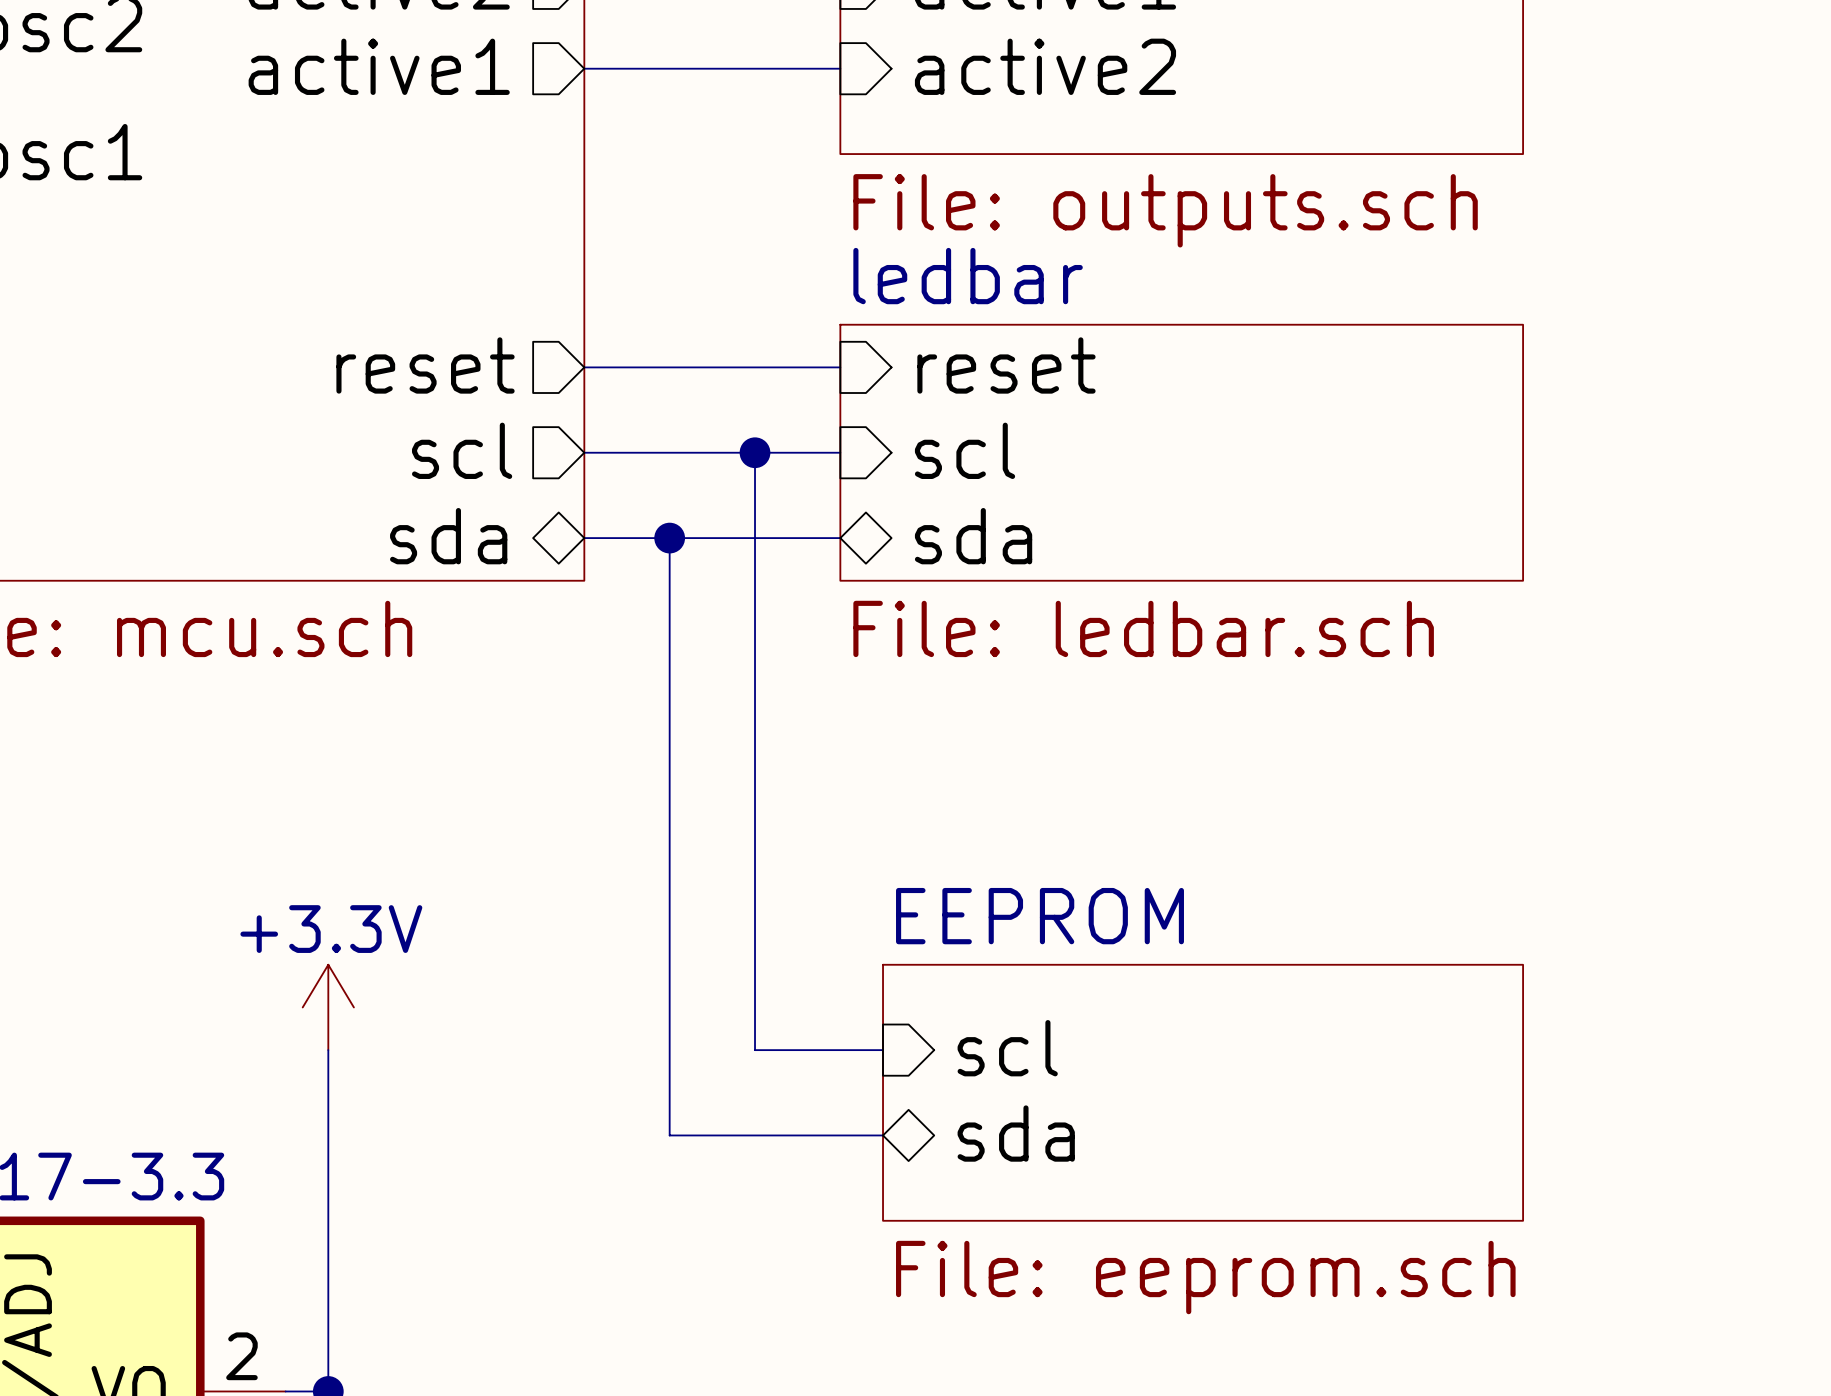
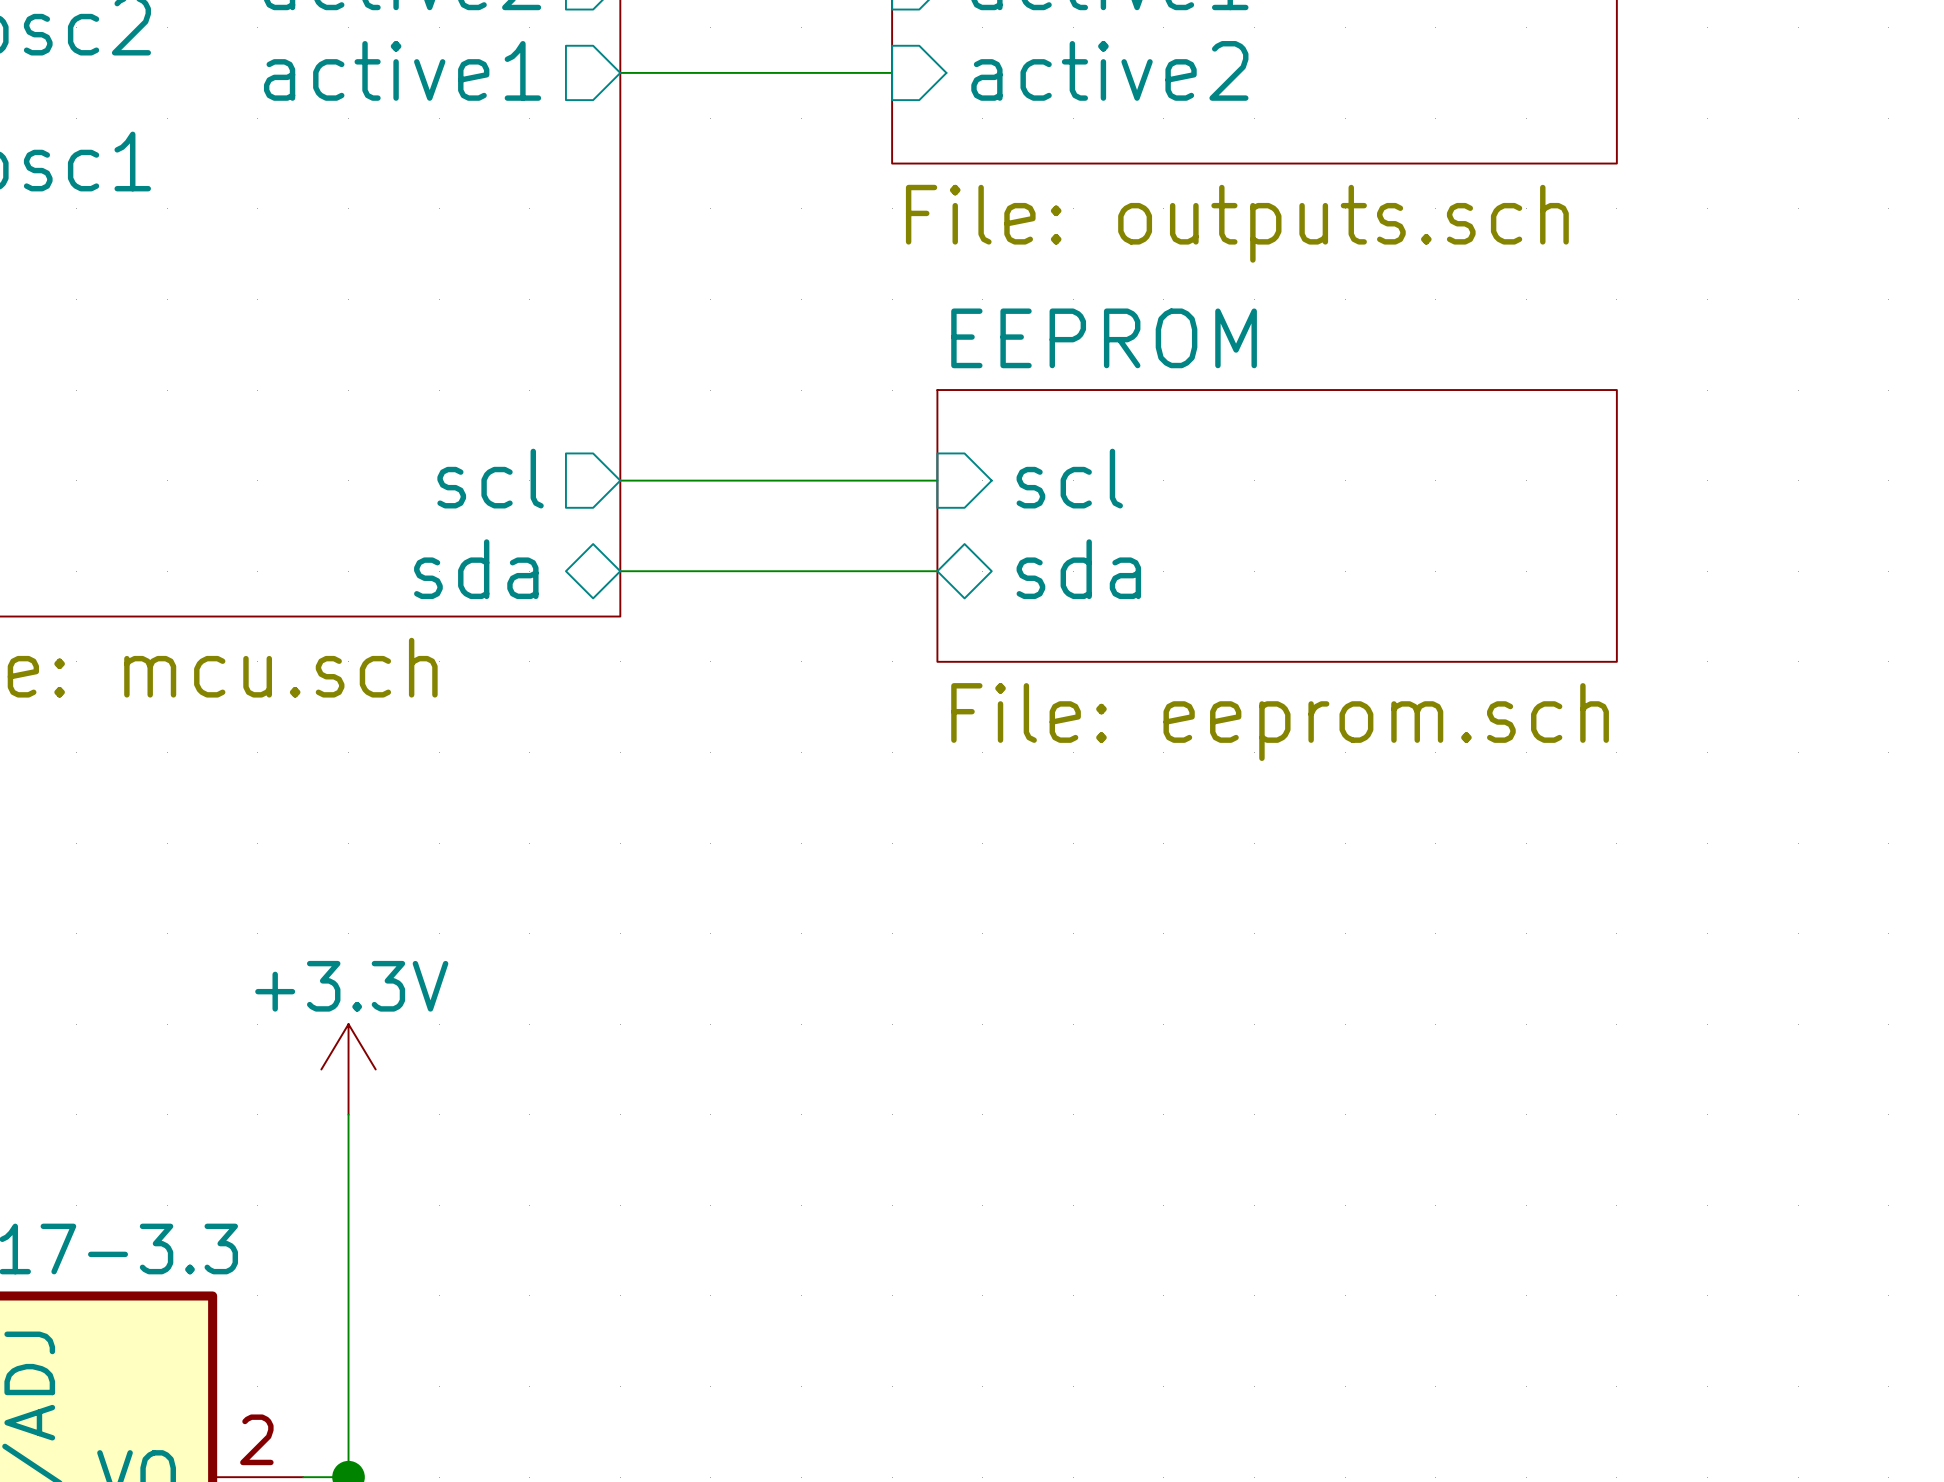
sheet pin: reset (425, 365) -> none
sheet pin: reset (1006, 365) -> none
wire: (584, 367) (840, 367) -> none
sheet pin position: scl (965, 450) -> scl (1069, 478)
wire: (755, 452) (755, 1050) (883, 1050) -> none
junction: (755, 452) -> none
wire: none -> (892, 480) (937, 480)
sheet ledbar: File: ledbar.sch (1181, 452) -> none
sheet pin position: sda (973, 536) -> sda (1078, 569)
wire: (669, 538) (669, 1135) (883, 1135) -> none
junction: (669, 538) -> none
wire: none -> (892, 571) (937, 571)
sheet pin: scl (1007, 1048) -> none
sheet EEPROM position: (1203, 1092) -> (1277, 525)
sheet pin: sda (1016, 1133) -> none

